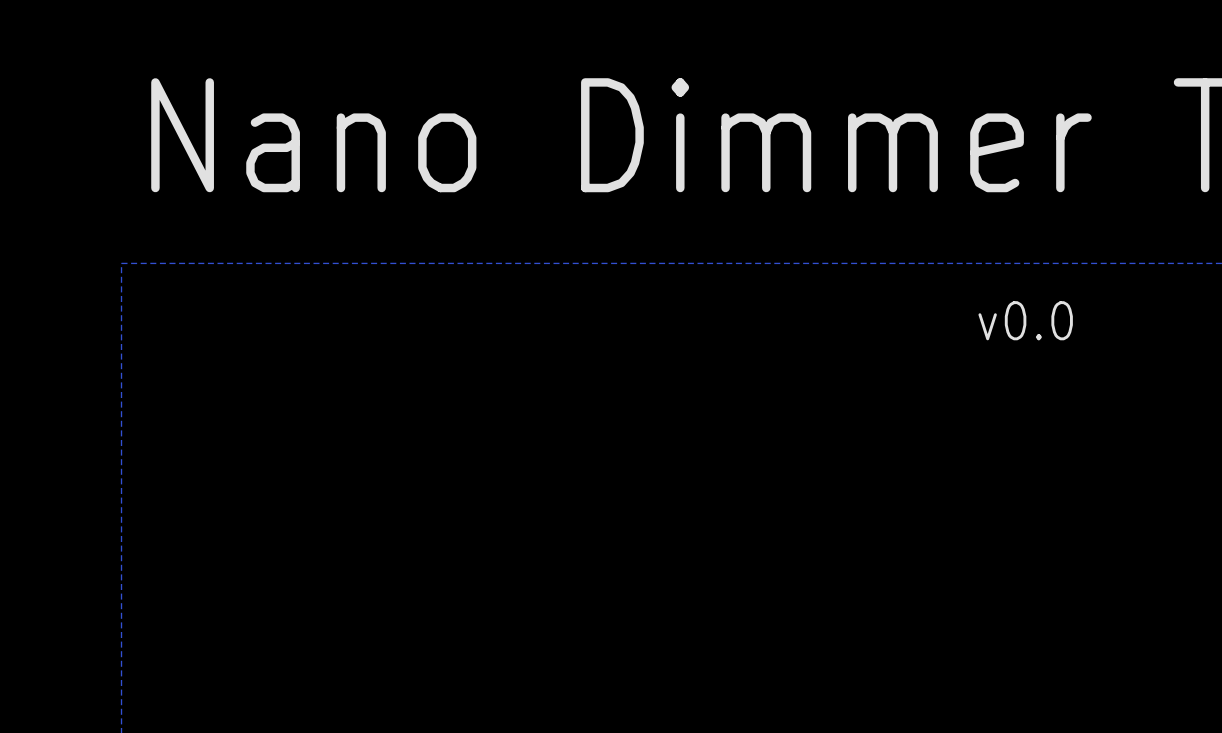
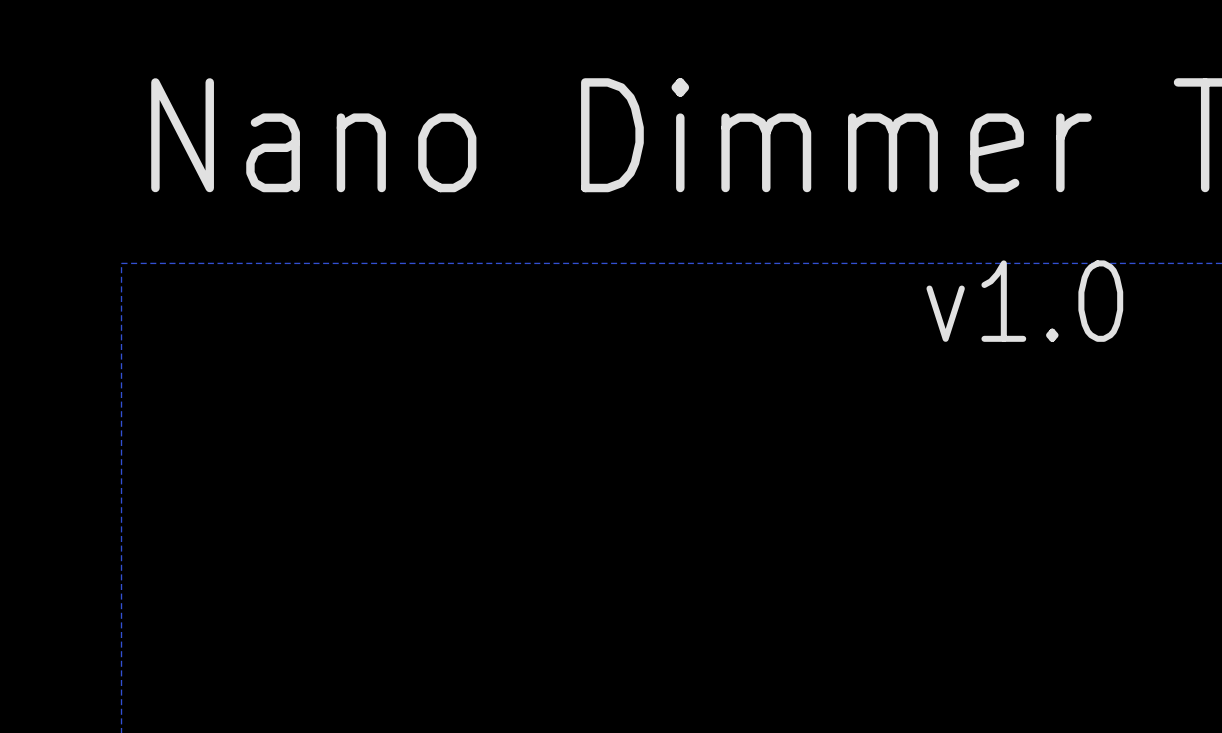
text: v0.0 (1025, 320) -> v1.0 (1024, 301)

